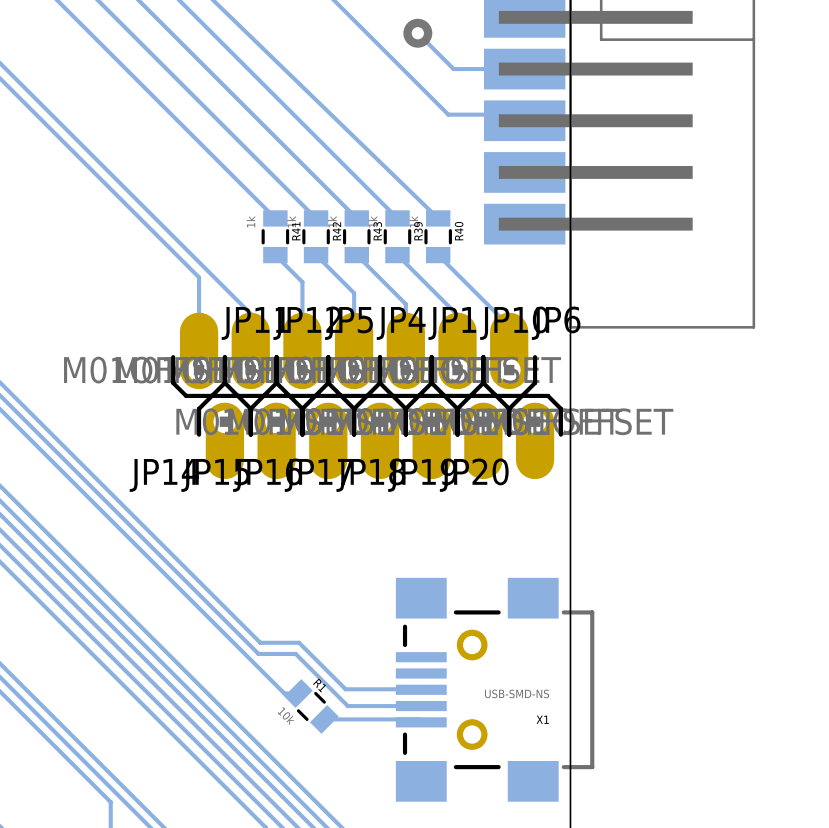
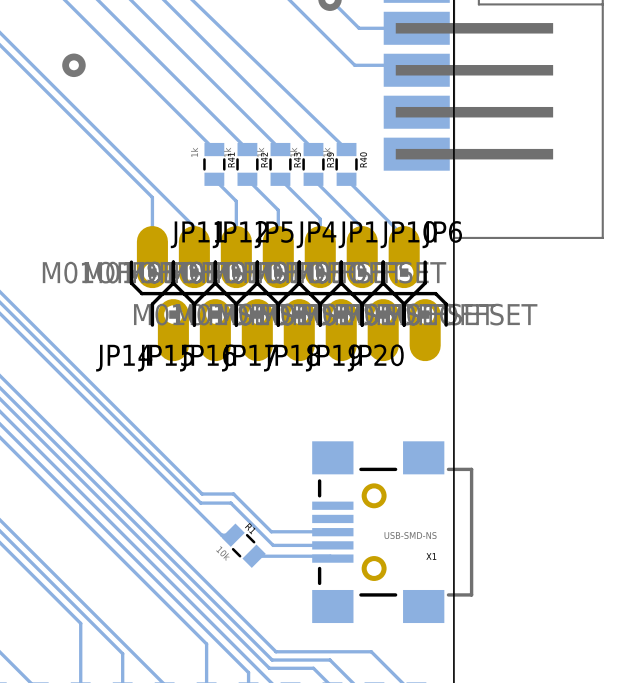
via: none -> (73, 65)

